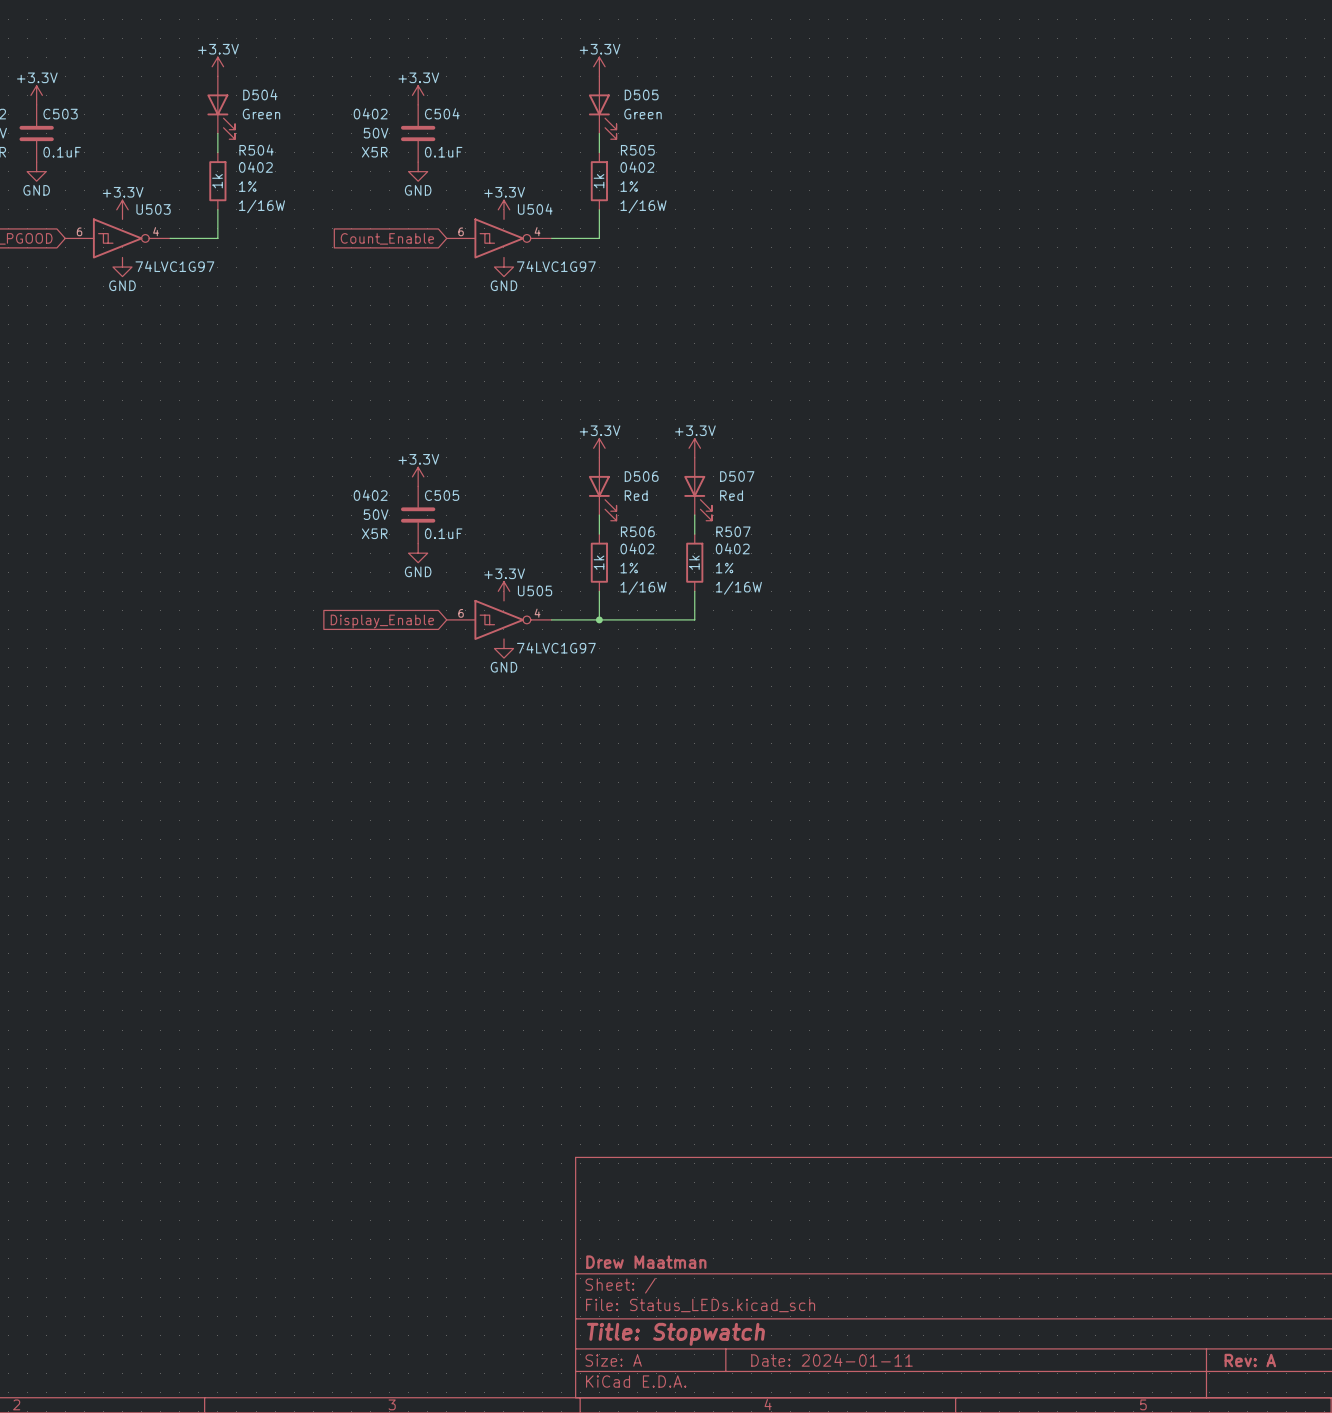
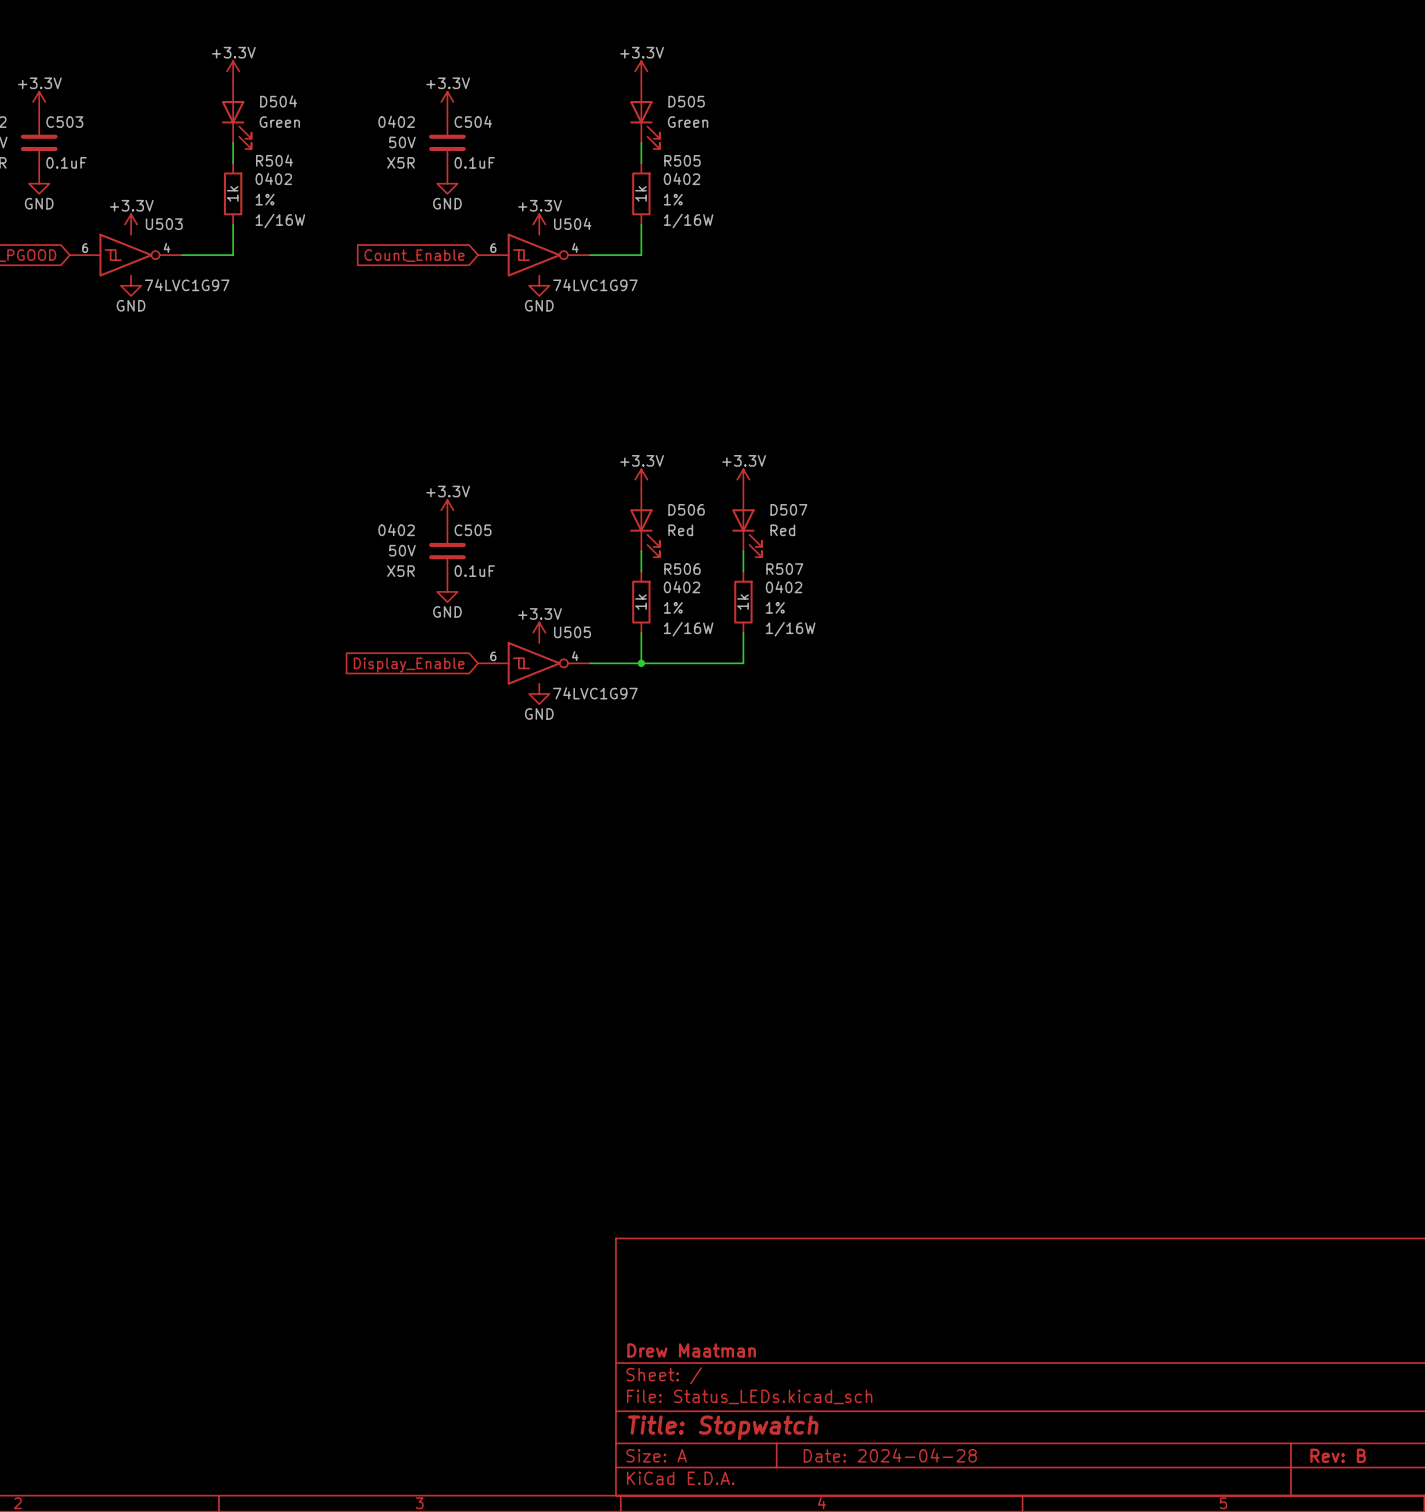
title block: Date: 2024-01-11 (832, 1360) -> Date: 2024-04-28 (890, 1455)
title block: Rev: A (1250, 1360) -> Rev: B (1338, 1455)

